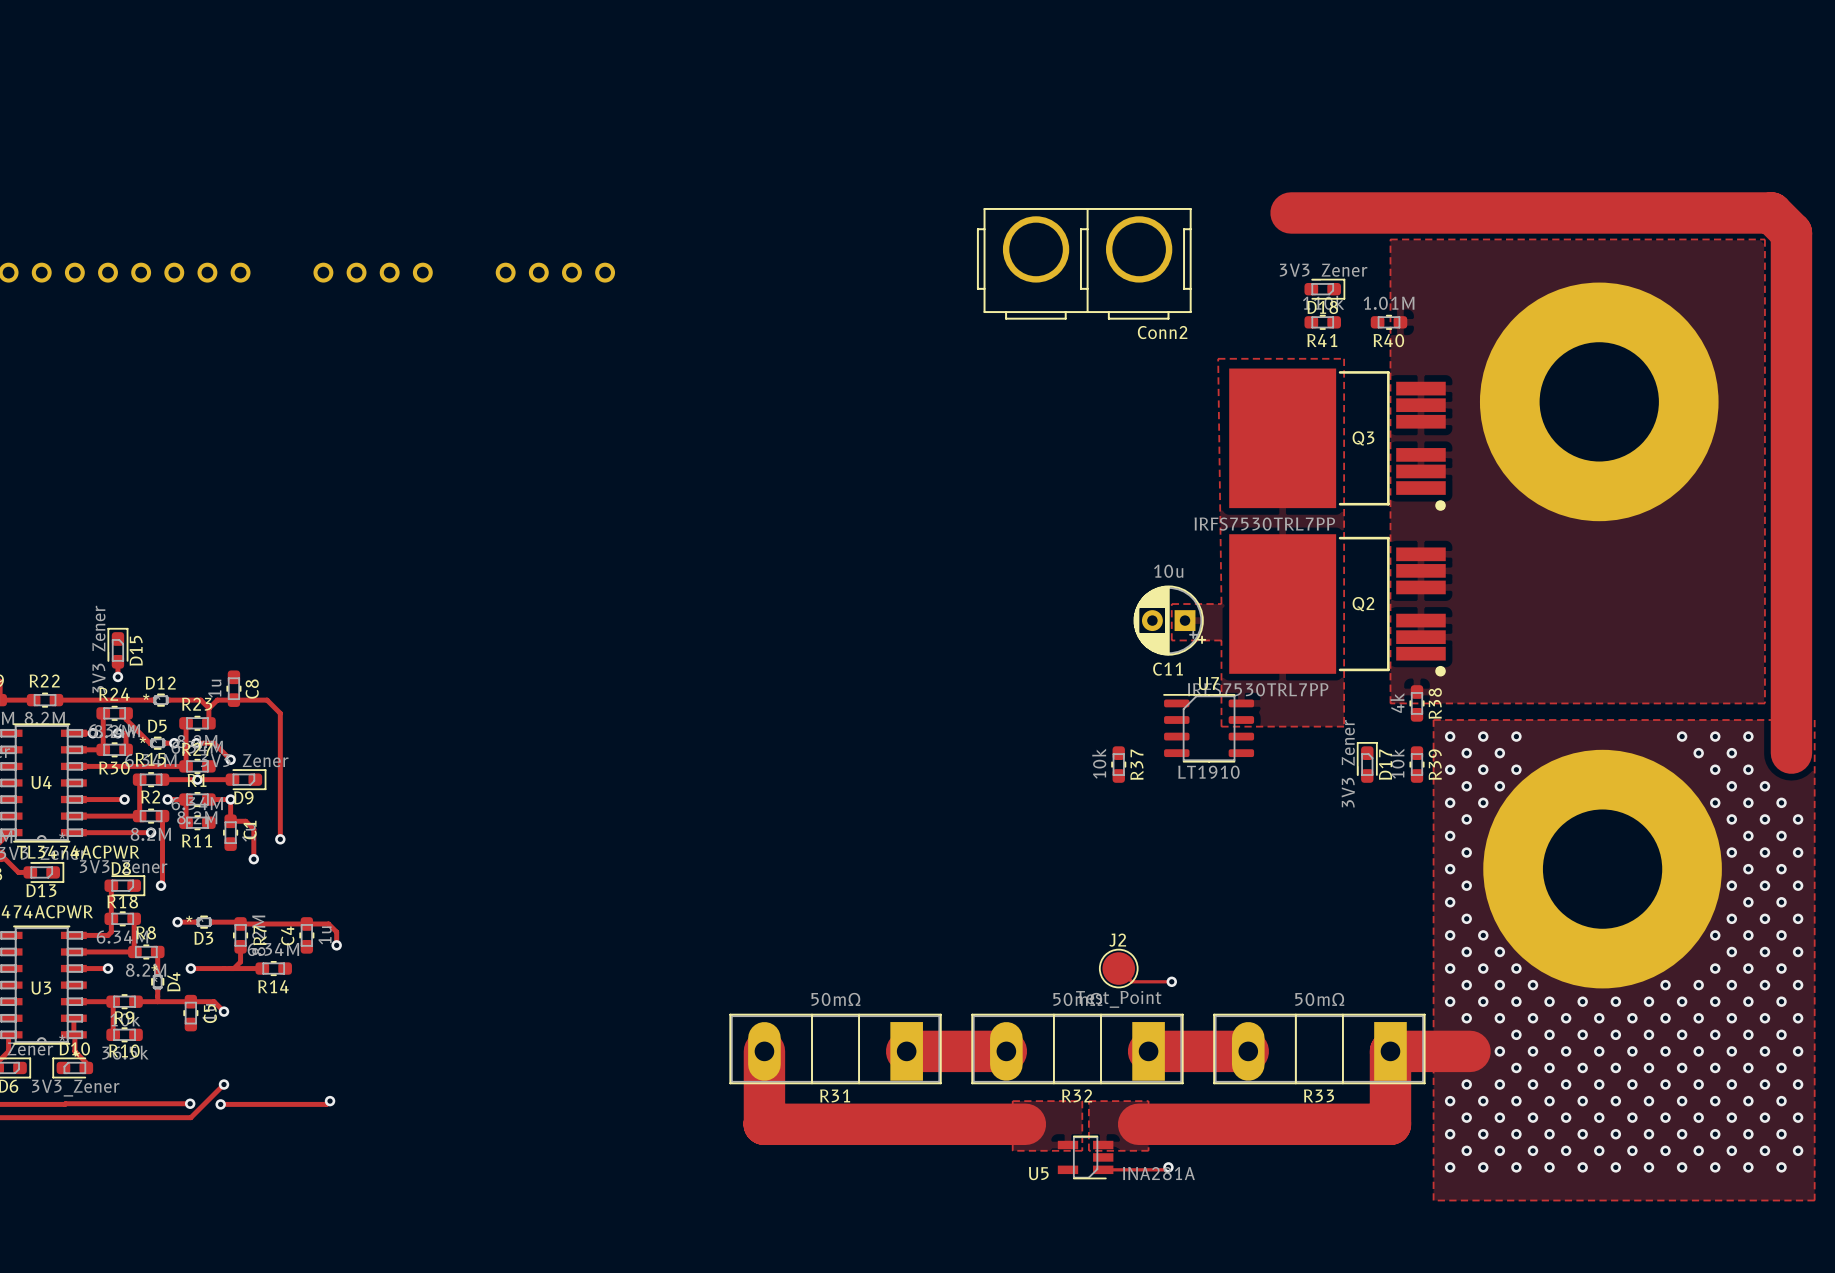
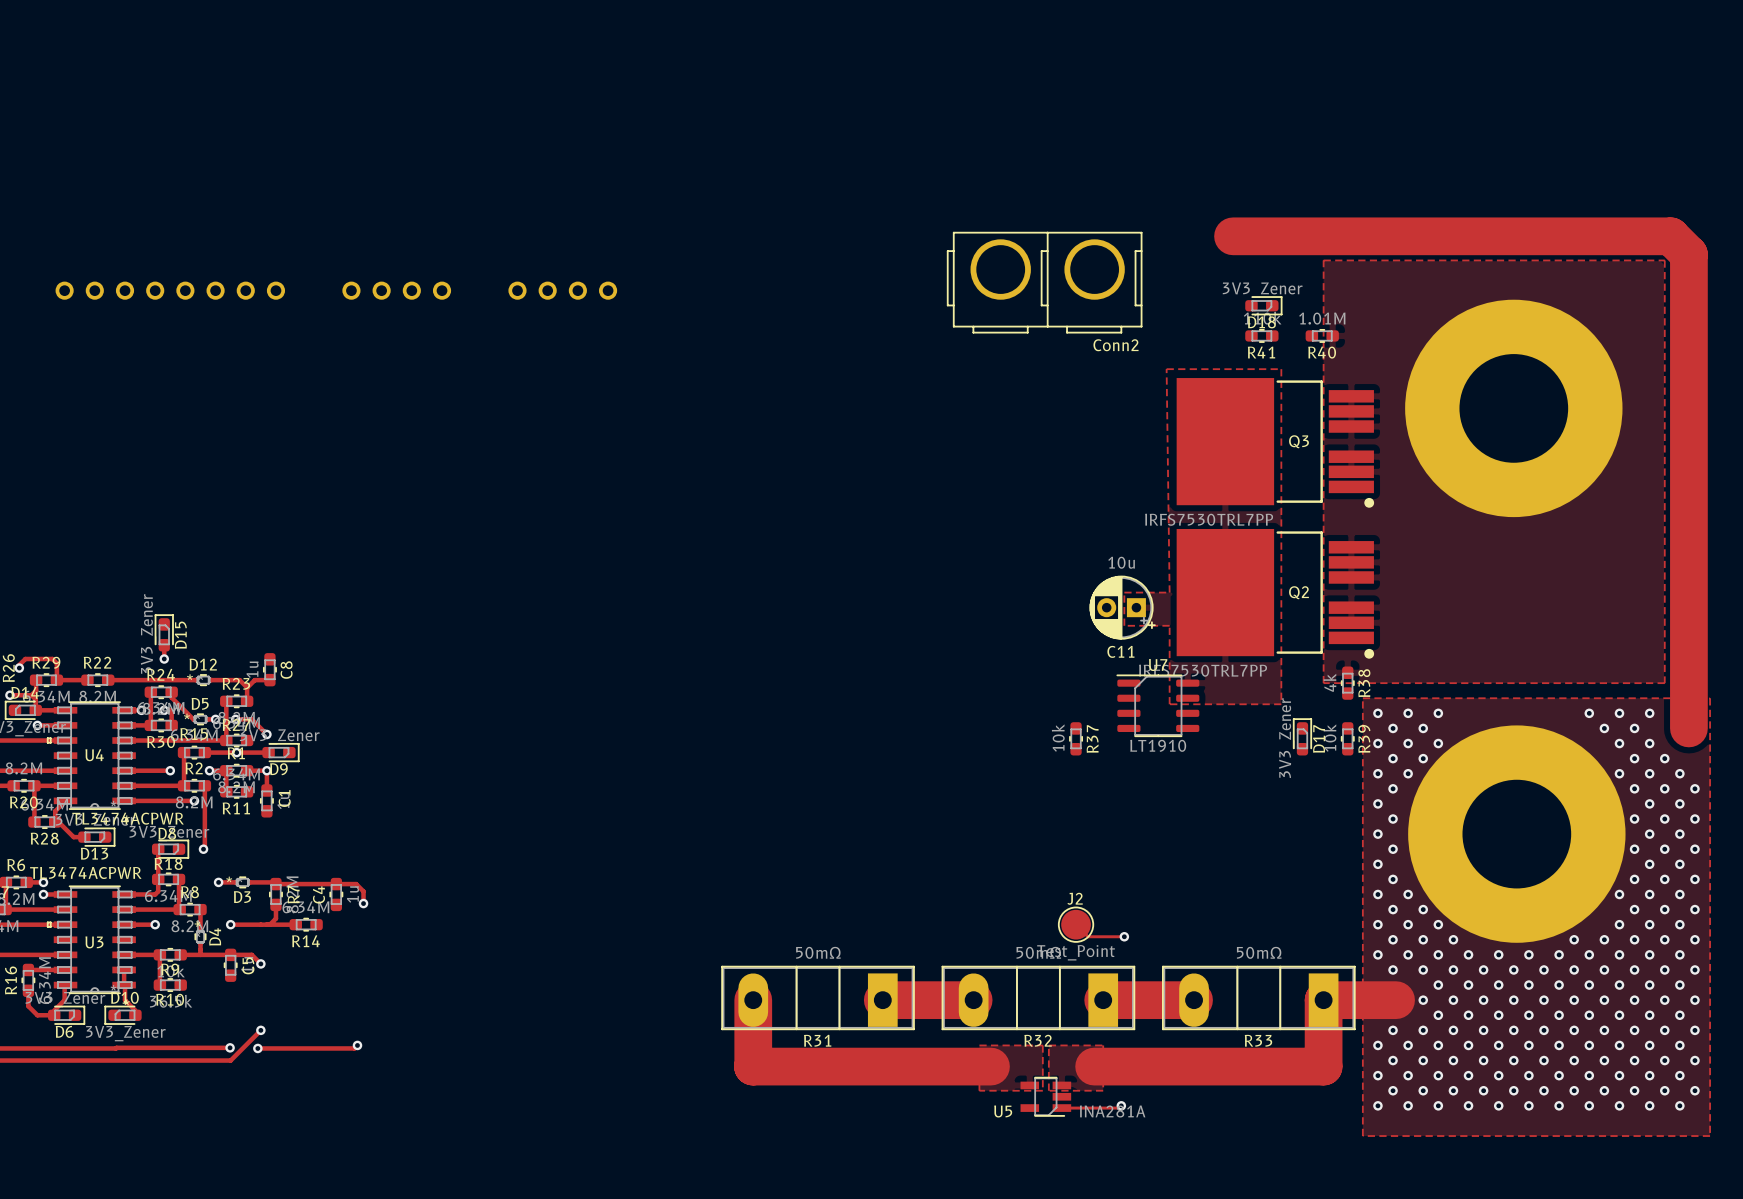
track: (233, 700) (267, 700) (280, 713) (280, 839) -> none
track: (230, 821) (245, 821) (253, 829) (253, 859) -> none
via: (280, 839) -> none
via: (253, 859) -> none

